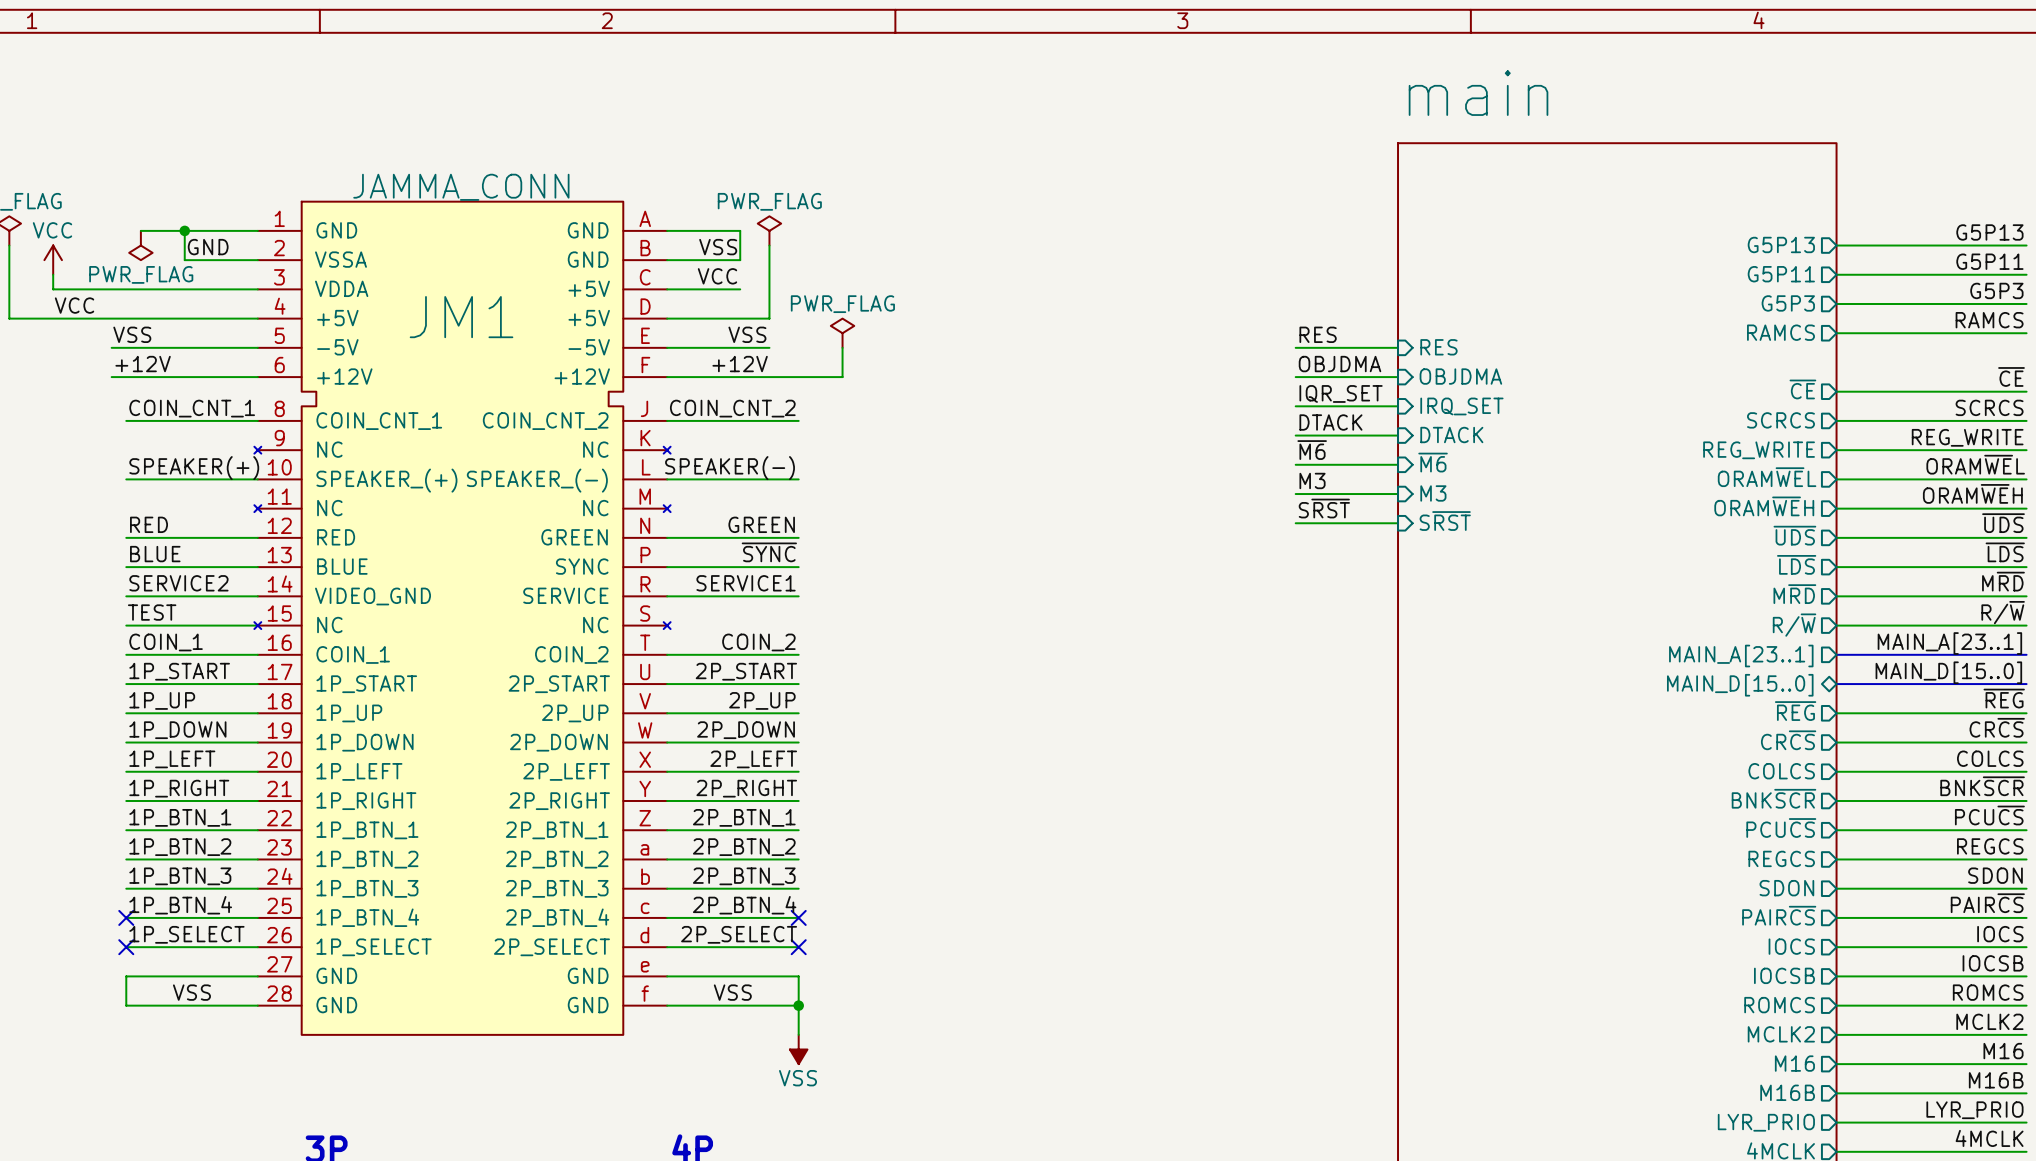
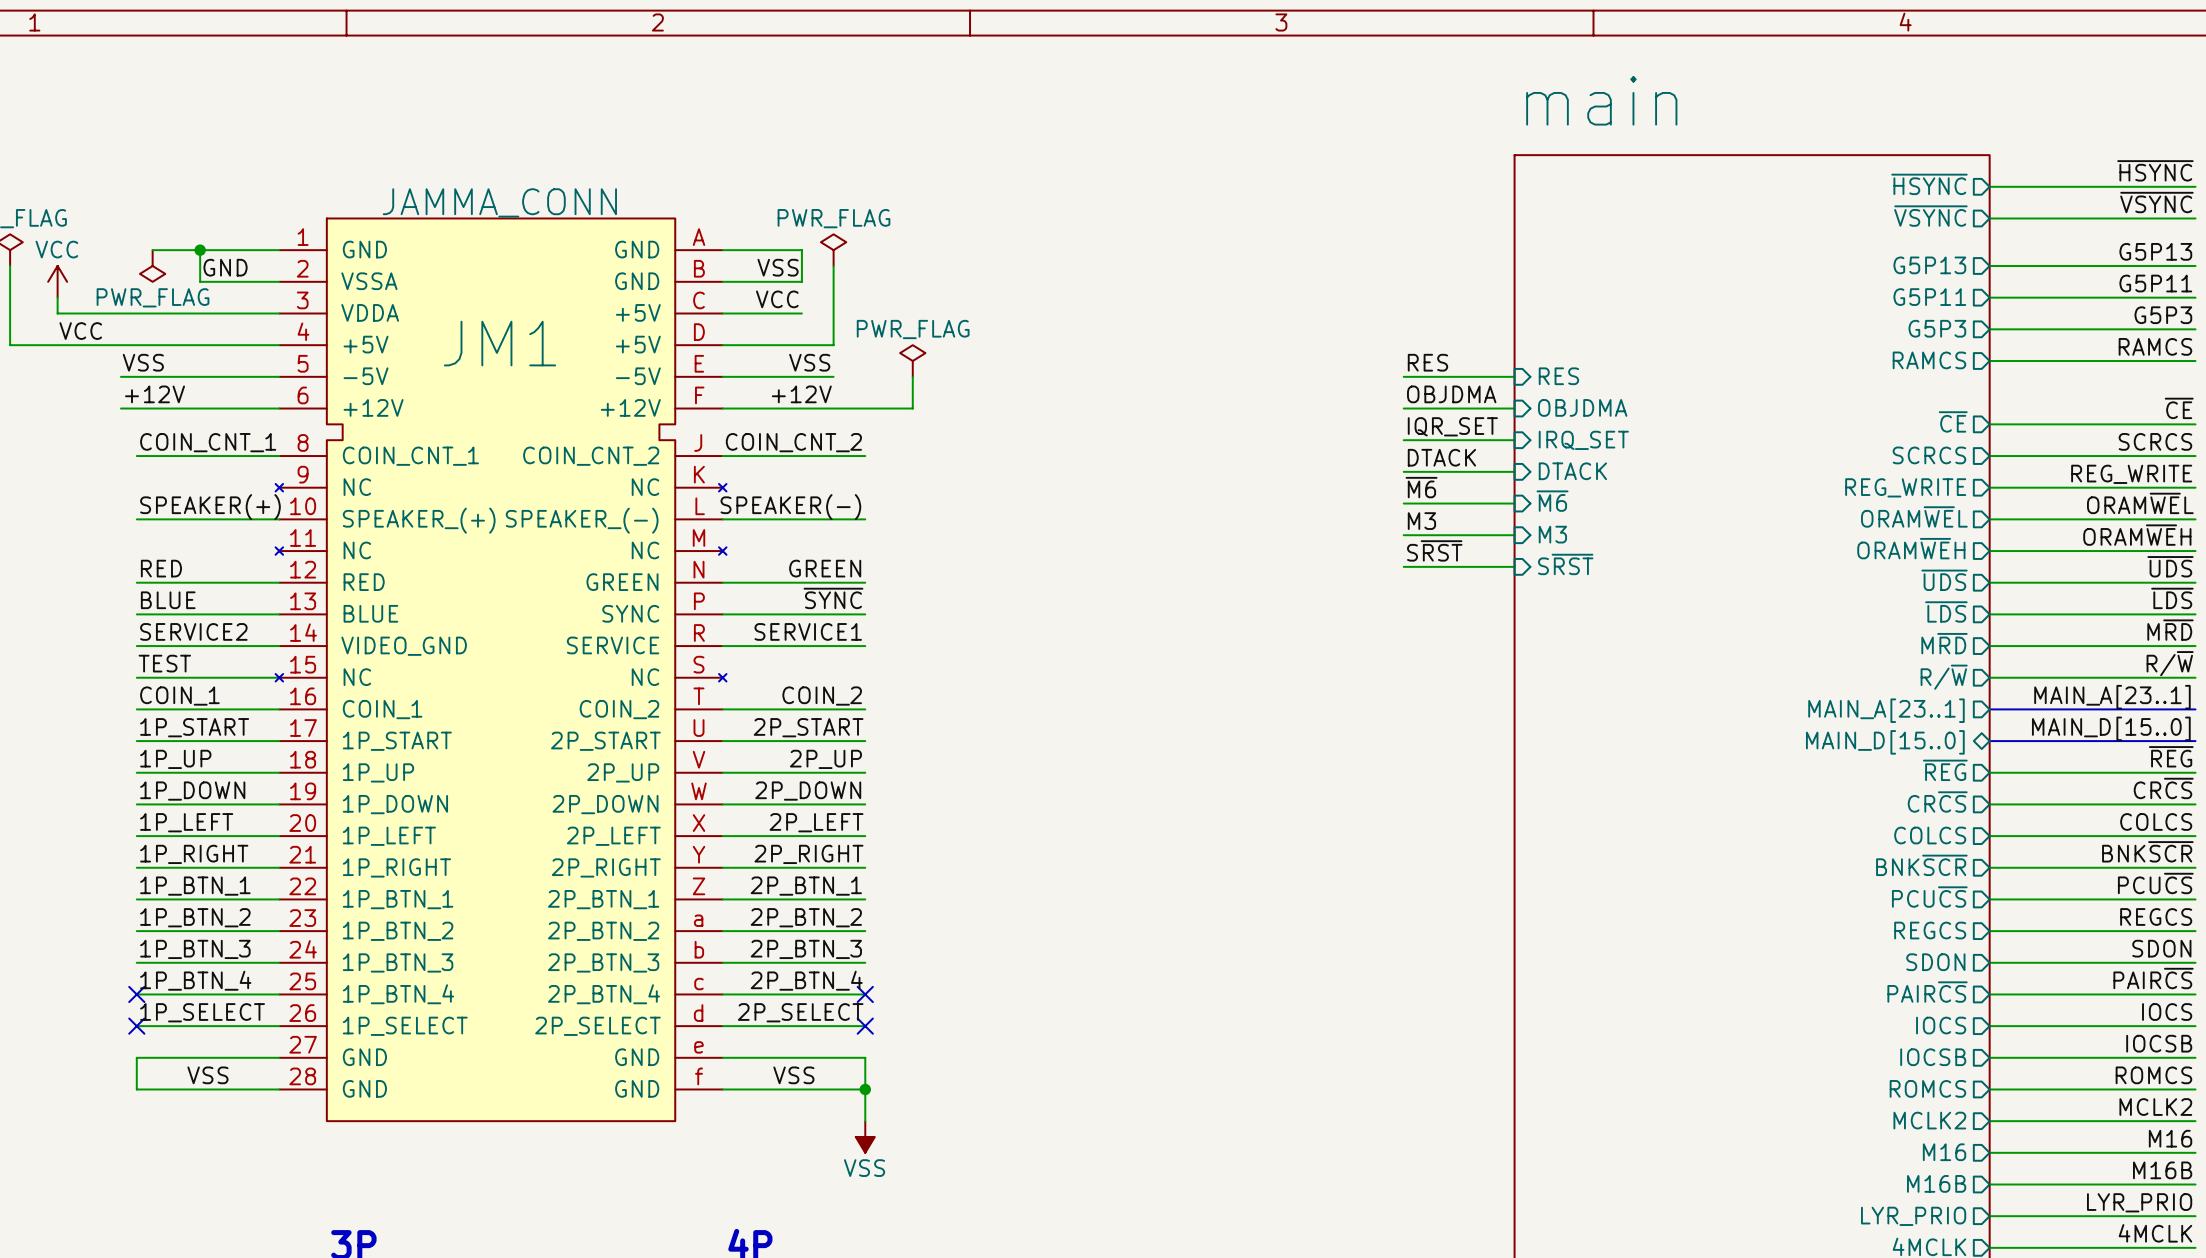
label: none -> ~{HSYNC} (2155, 170)
sheet pin: none -> ~{HSYNC} (1929, 184)
wire: none -> (1989, 186) (2195, 186)
label: none -> ~{VSYNC} (2156, 202)
sheet pin: none -> ~{VSYNC} (1930, 216)
wire: none -> (1989, 218) (2195, 218)

